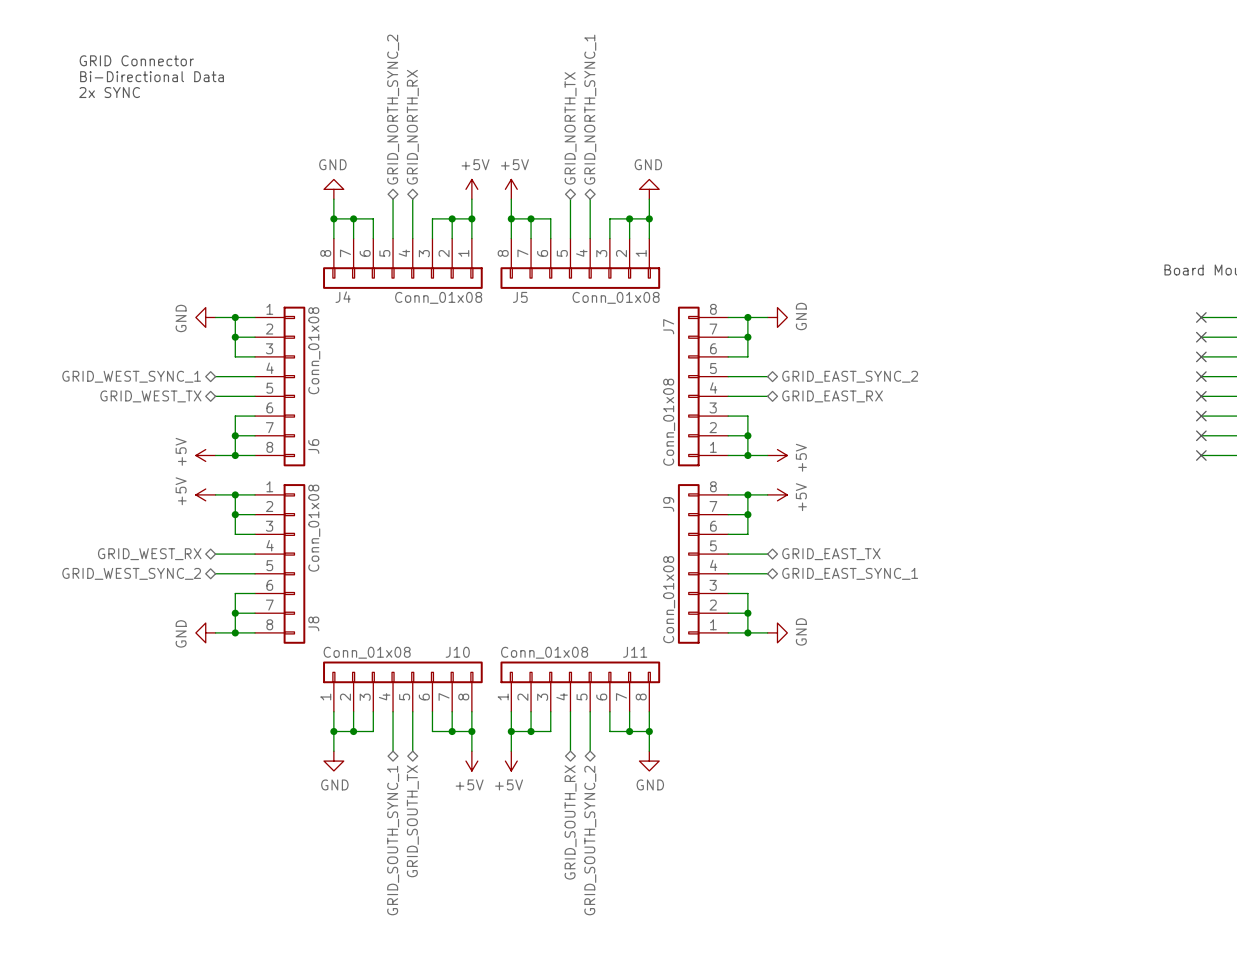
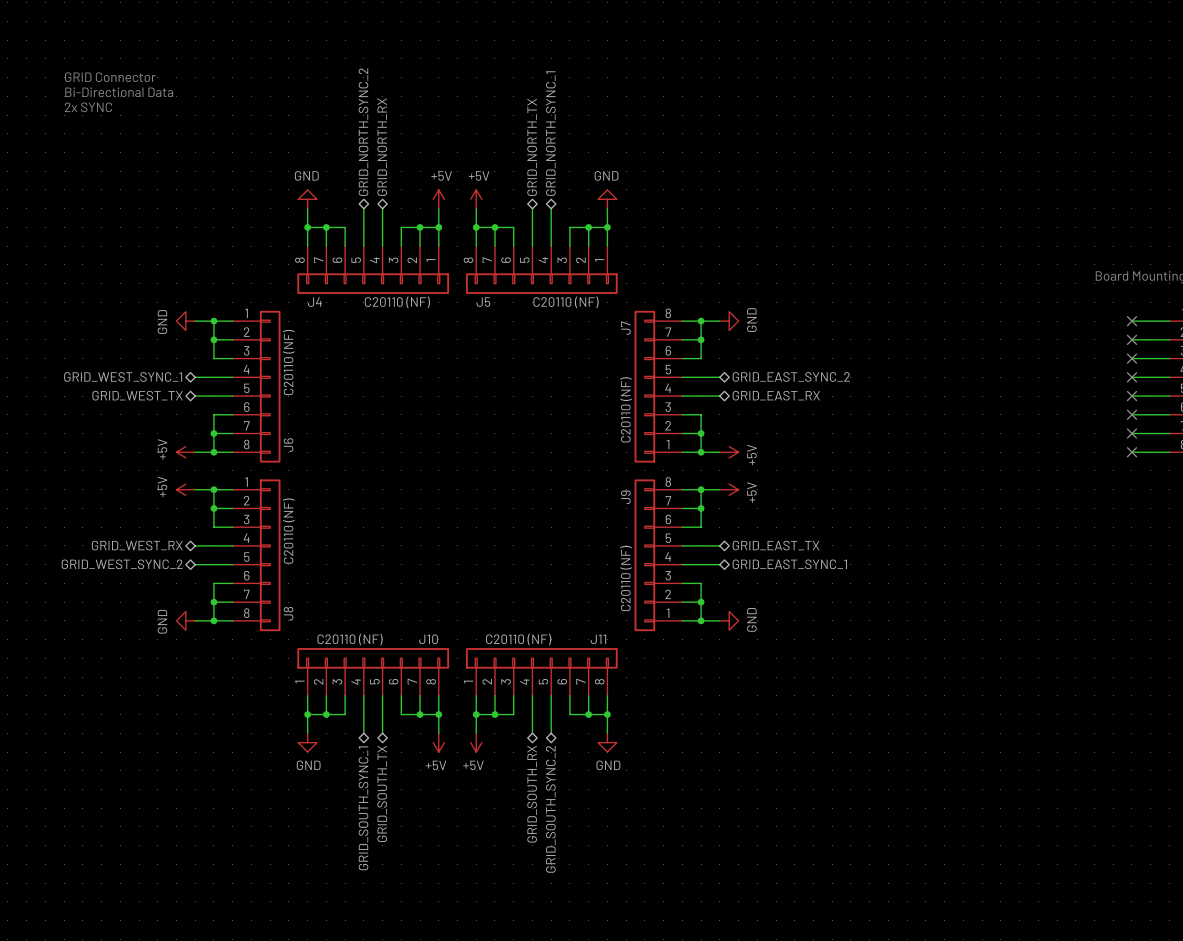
J4 value: Conn_01x08 (438, 297) -> C20110 (NF) (397, 302)
J5 value: Conn_01x08 (616, 297) -> C20110 (NF) (566, 302)
J6 value: Conn_01x08 (314, 350) -> C20110 (NF) (288, 362)
J7 value: Conn_01x08 (669, 422) -> C20110 (NF) (626, 409)
J8 value: Conn_01x08 (314, 528) -> C20110 (NF) (288, 531)
J9 value: Conn_01x08 (669, 599) -> C20110 (NF) (626, 578)
J10 value: Conn_01x08 (367, 652) -> C20110 (NF) (350, 639)
J11 value: Conn_01x08 (544, 652) -> C20110 (NF) (518, 639)

